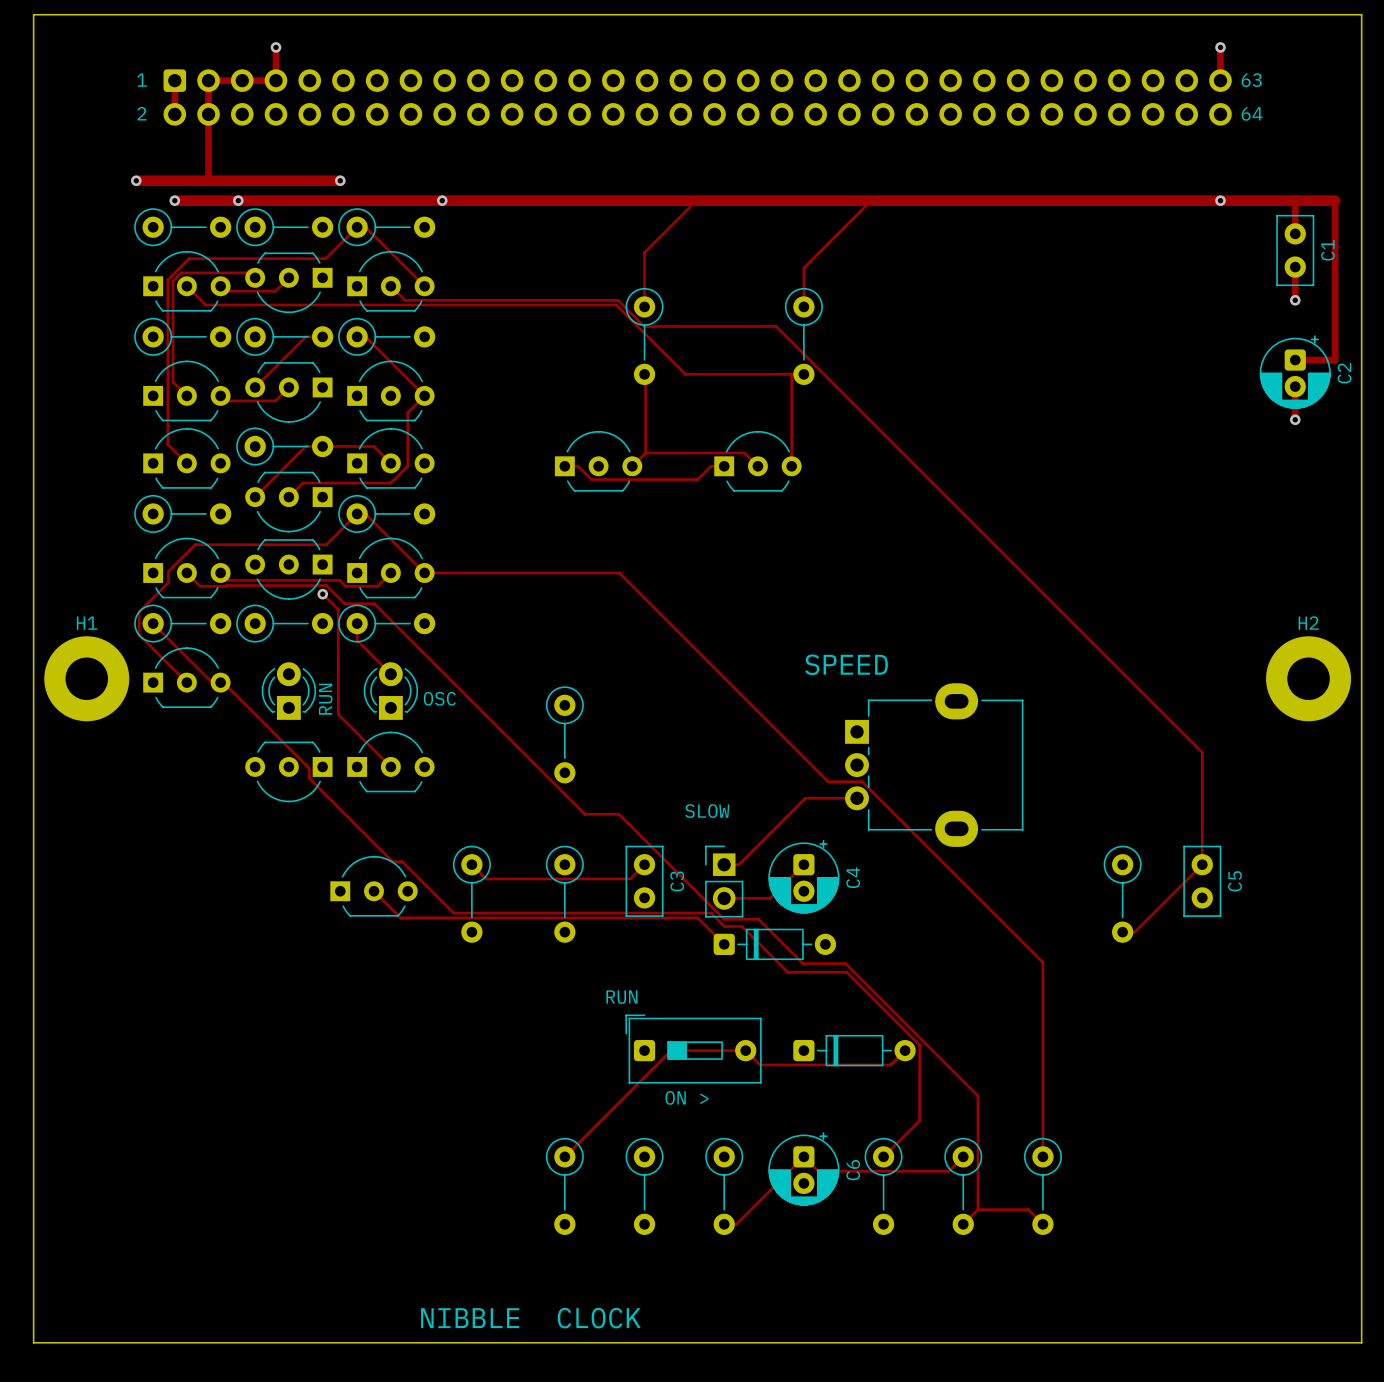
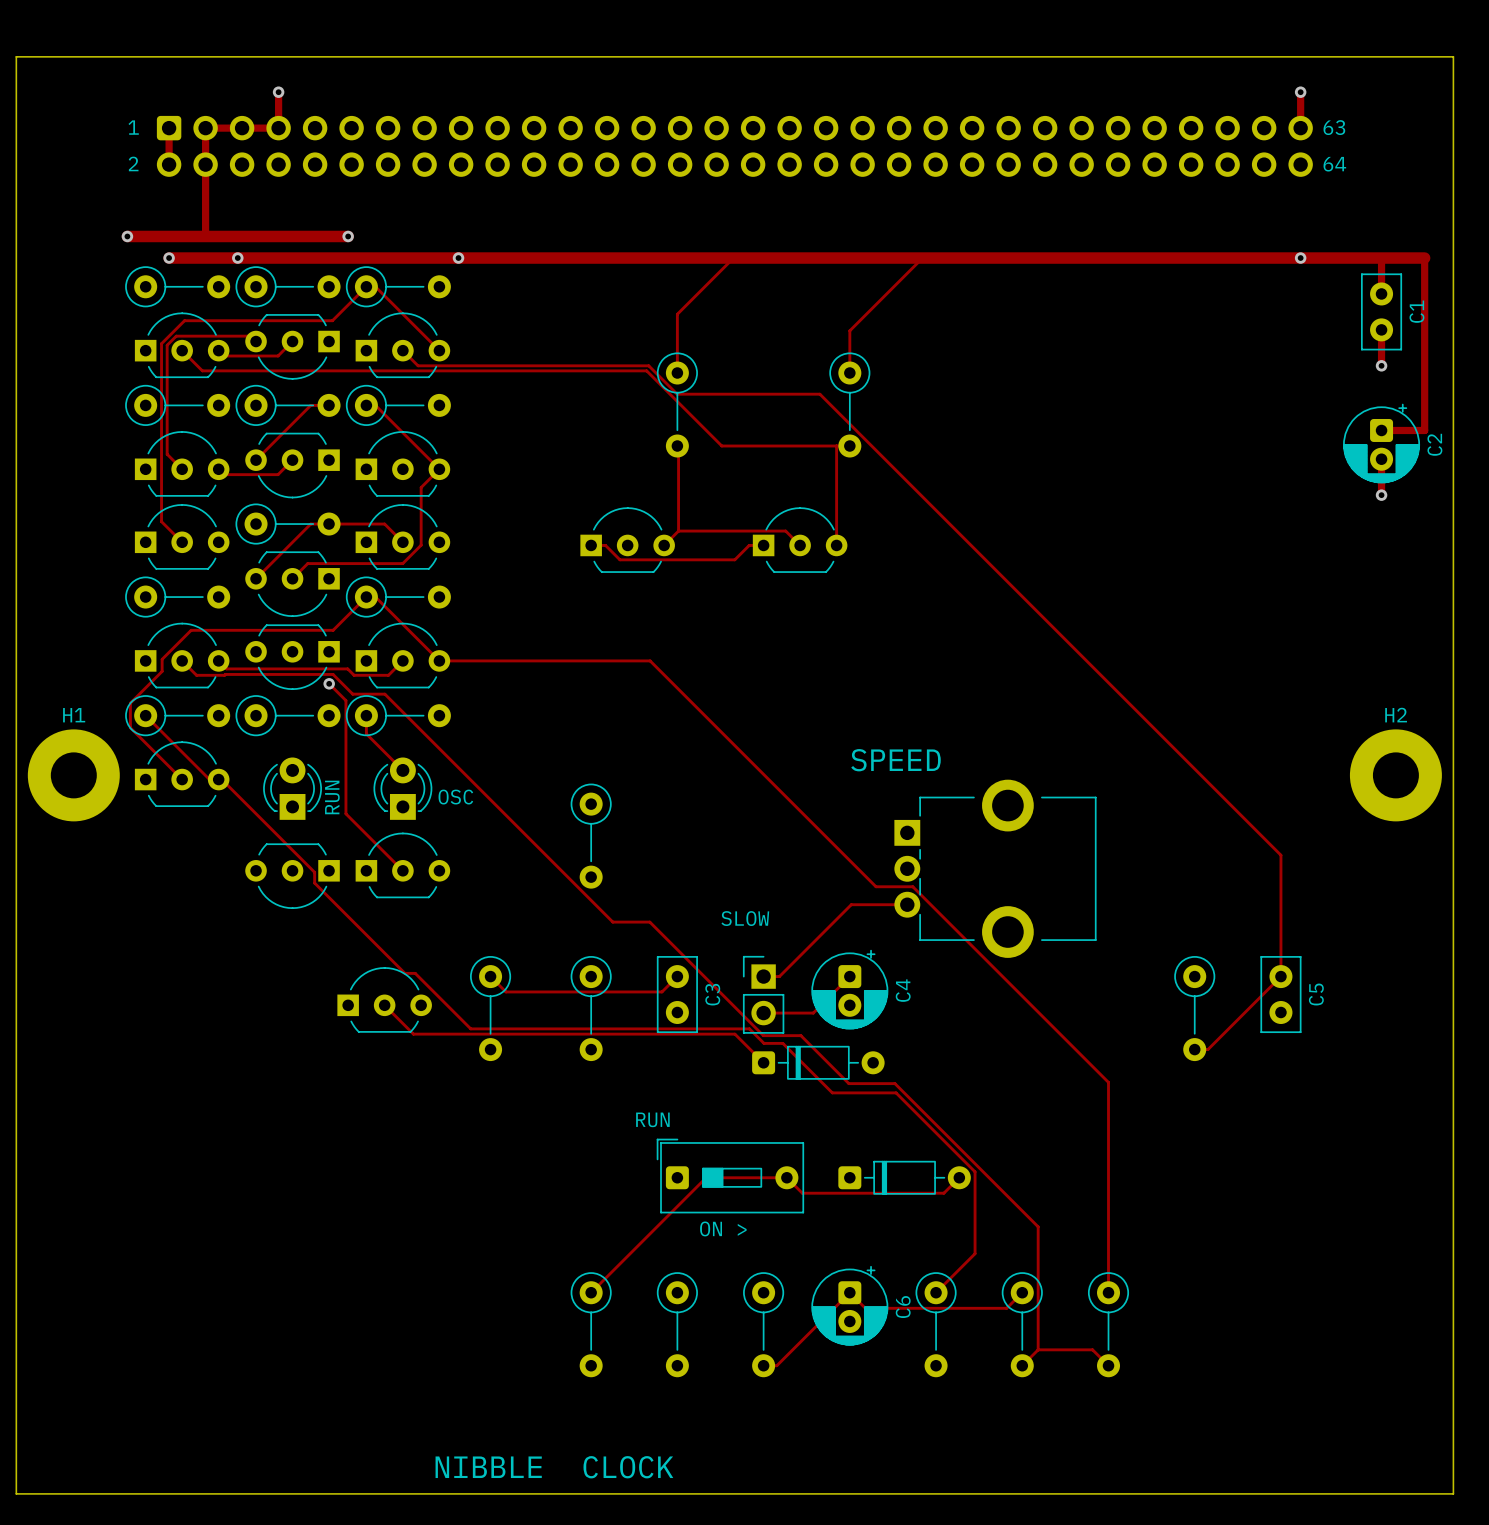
part footprint: [845, 683, 1024, 847] -> [894, 779, 1097, 958]

